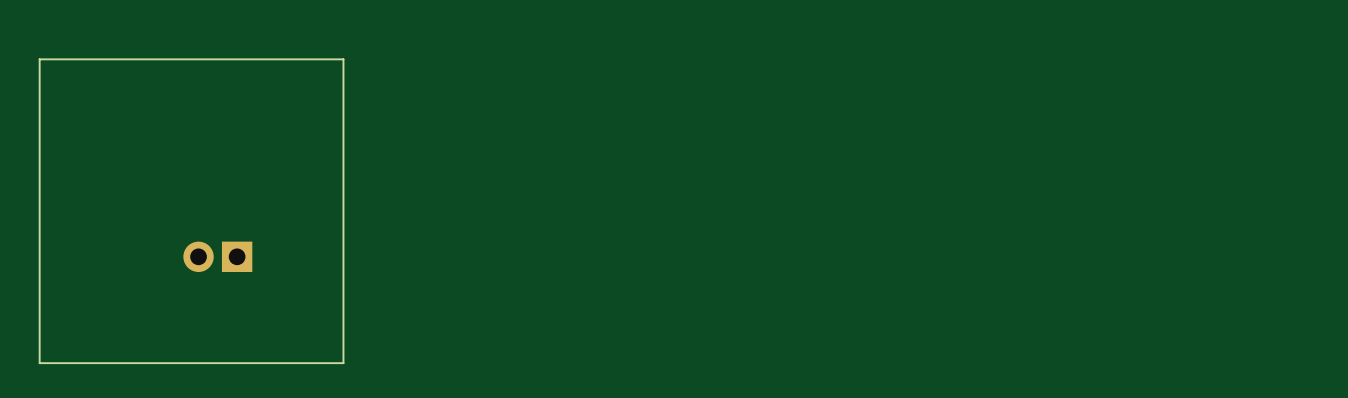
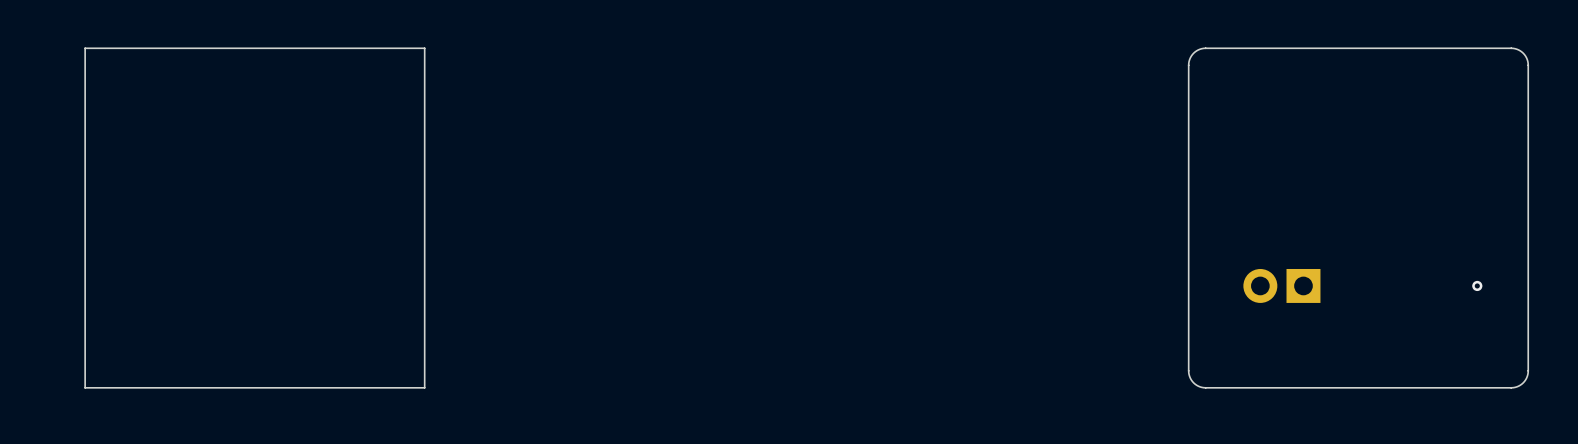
board edge: none -> (1511, 48) (1205, 48) (1193, 53) (1188, 65) (1188, 370) (1193, 382) (1205, 387) (1511, 387) (1523, 382) (1528, 370) (1528, 65) (1523, 53) (1511, 48)
part: (217, 256) -> none
part: none -> (1281, 285)
via: none -> (1477, 285)

